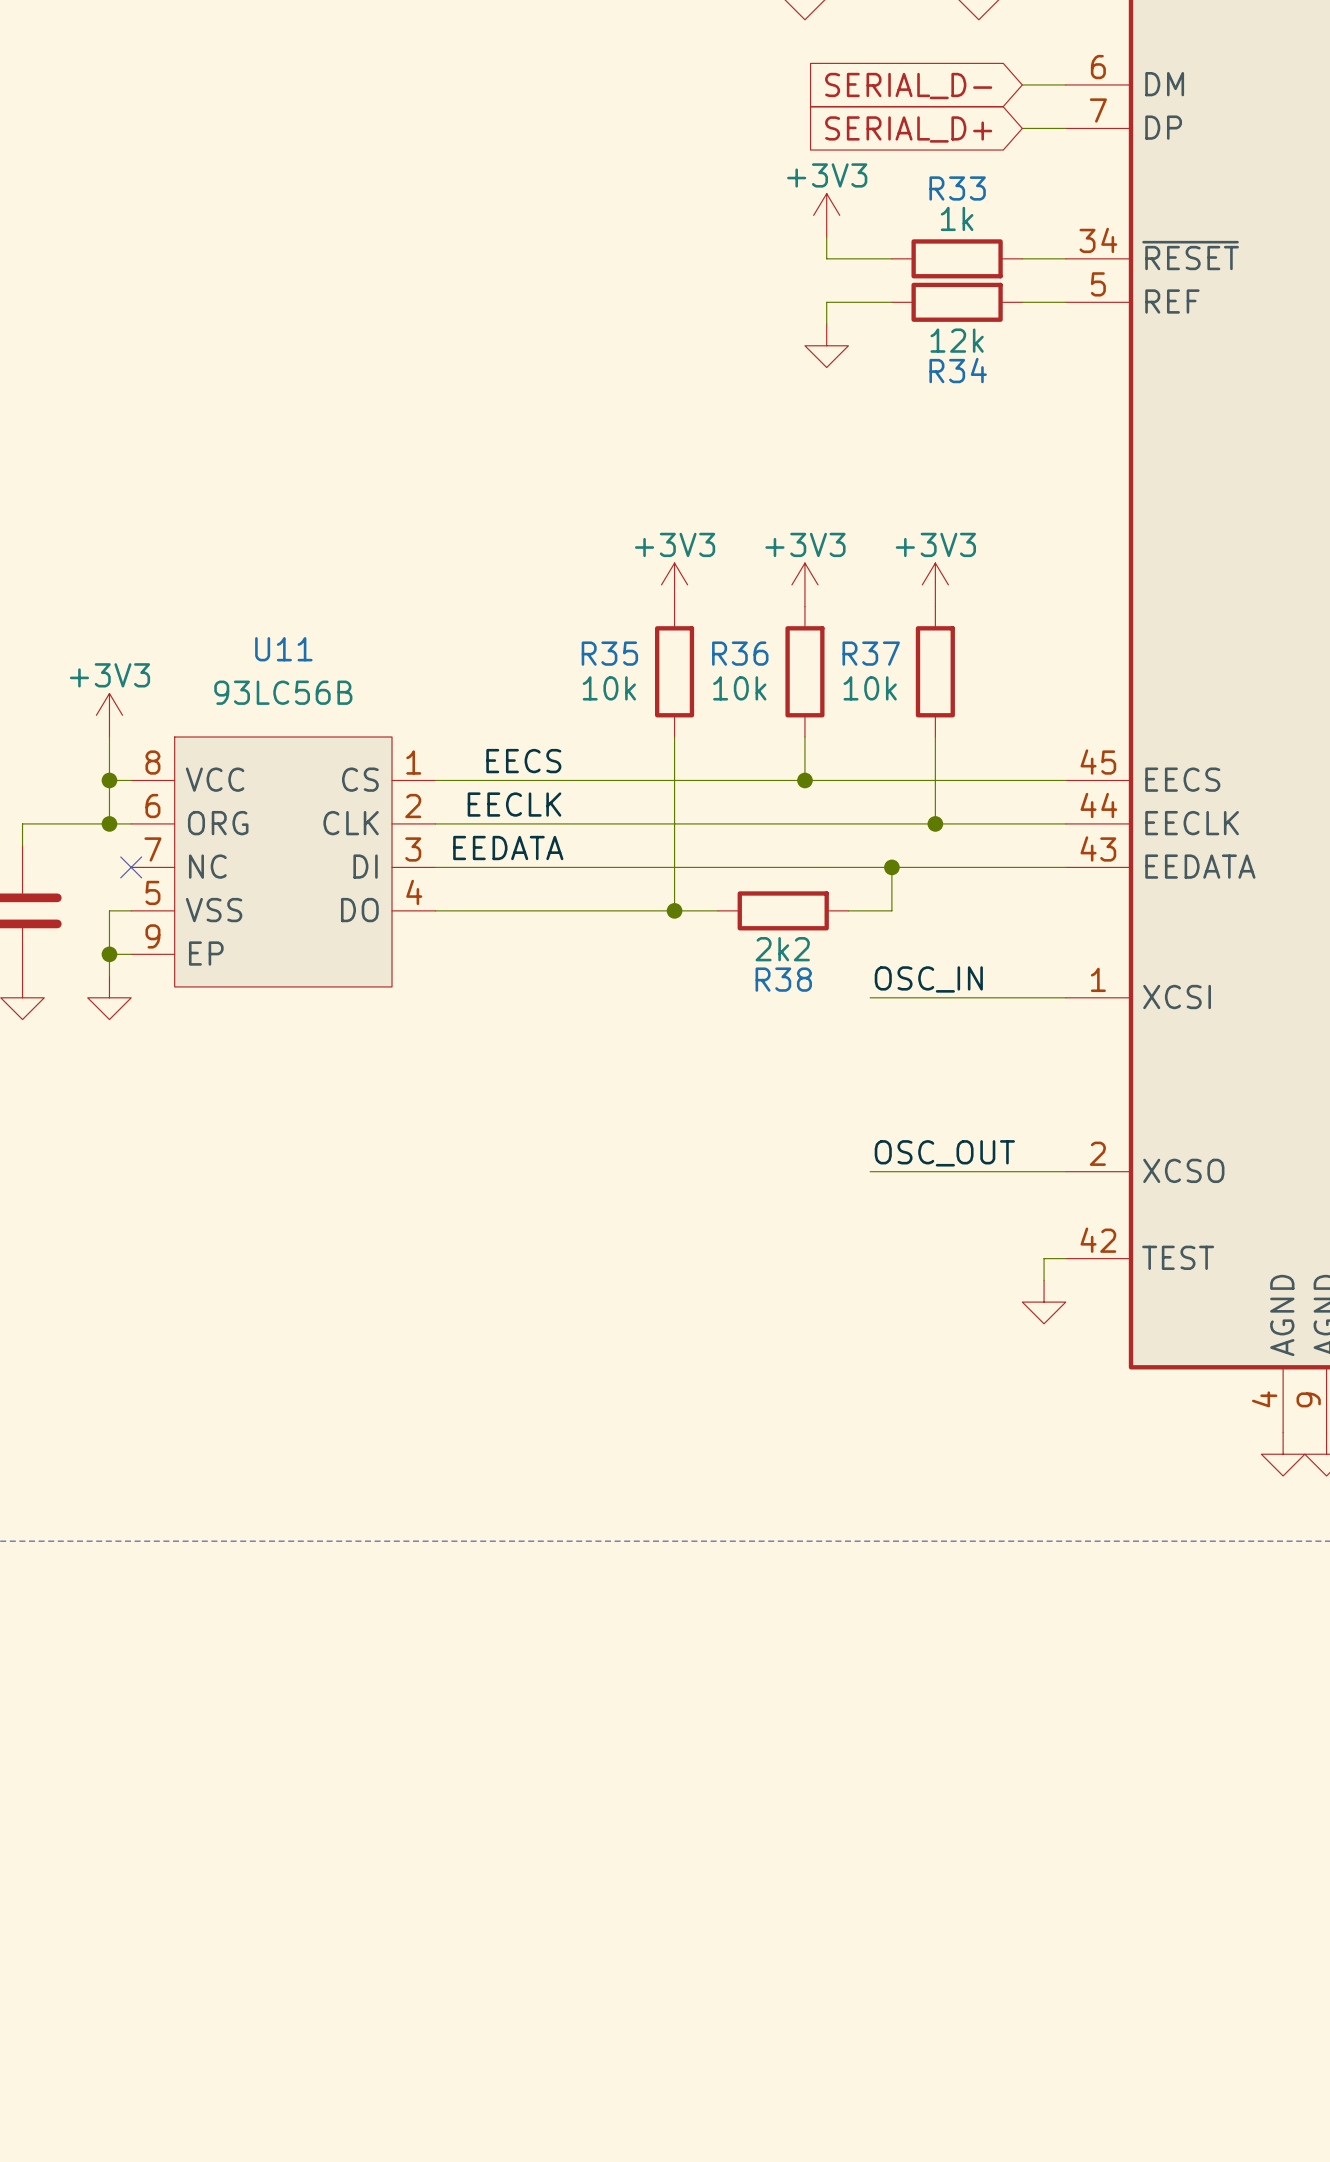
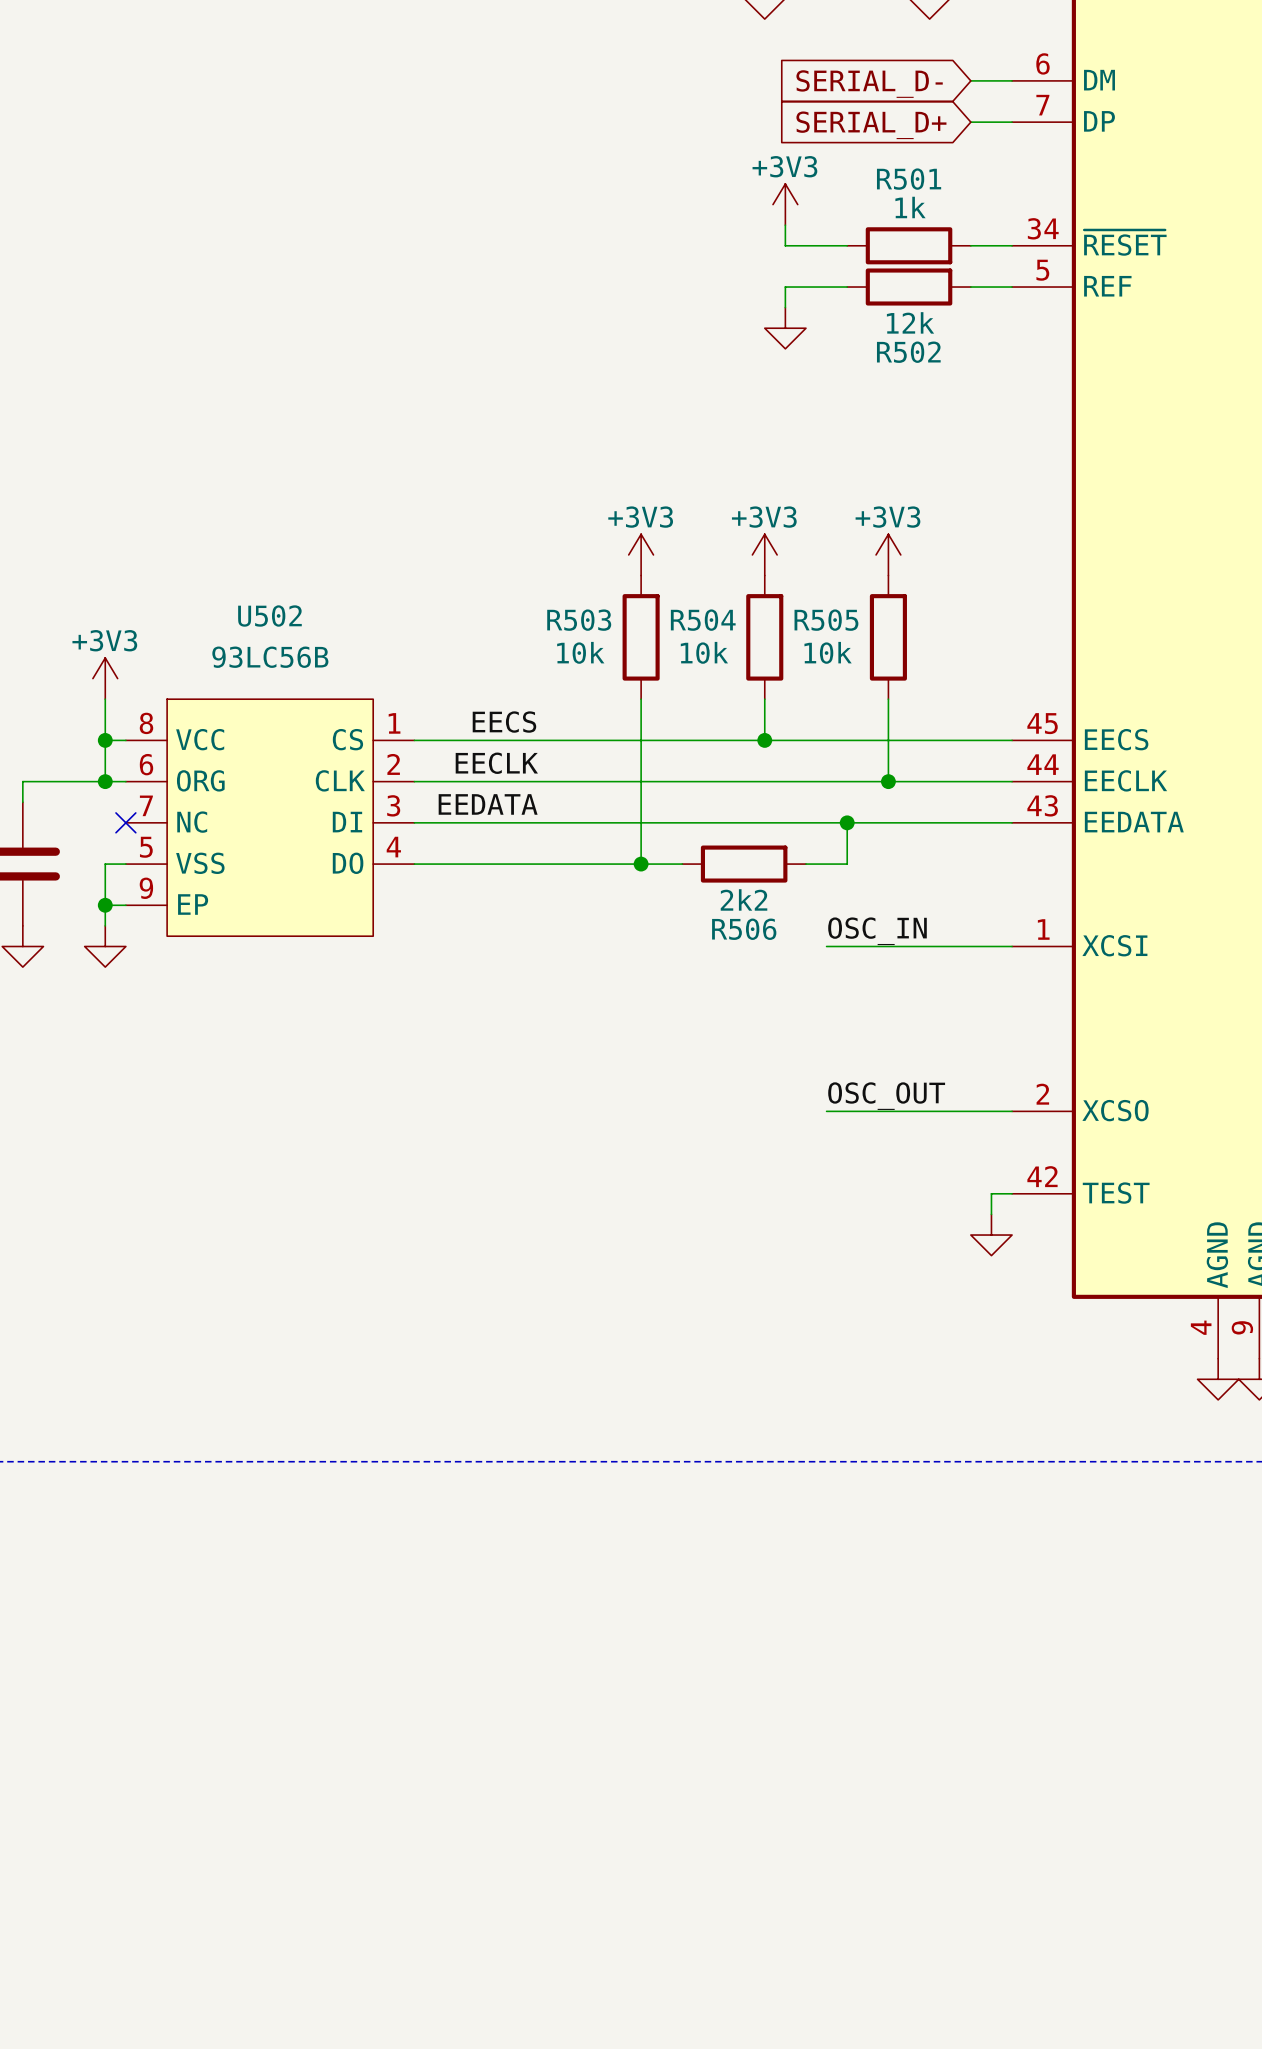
R33 name: R33 (957, 188) -> R501 (909, 179)
R34 name: R34 (958, 370) -> R502 (908, 352)
U11 name: U11 (283, 649) -> U502 (269, 616)
R35 name: R35 (609, 653) -> R503 (579, 620)
R36 name: R36 (740, 653) -> R504 (703, 620)
R37 name: R37 (871, 653) -> R505 (826, 620)
R38 name: R38 (783, 979) -> R506 (744, 929)

